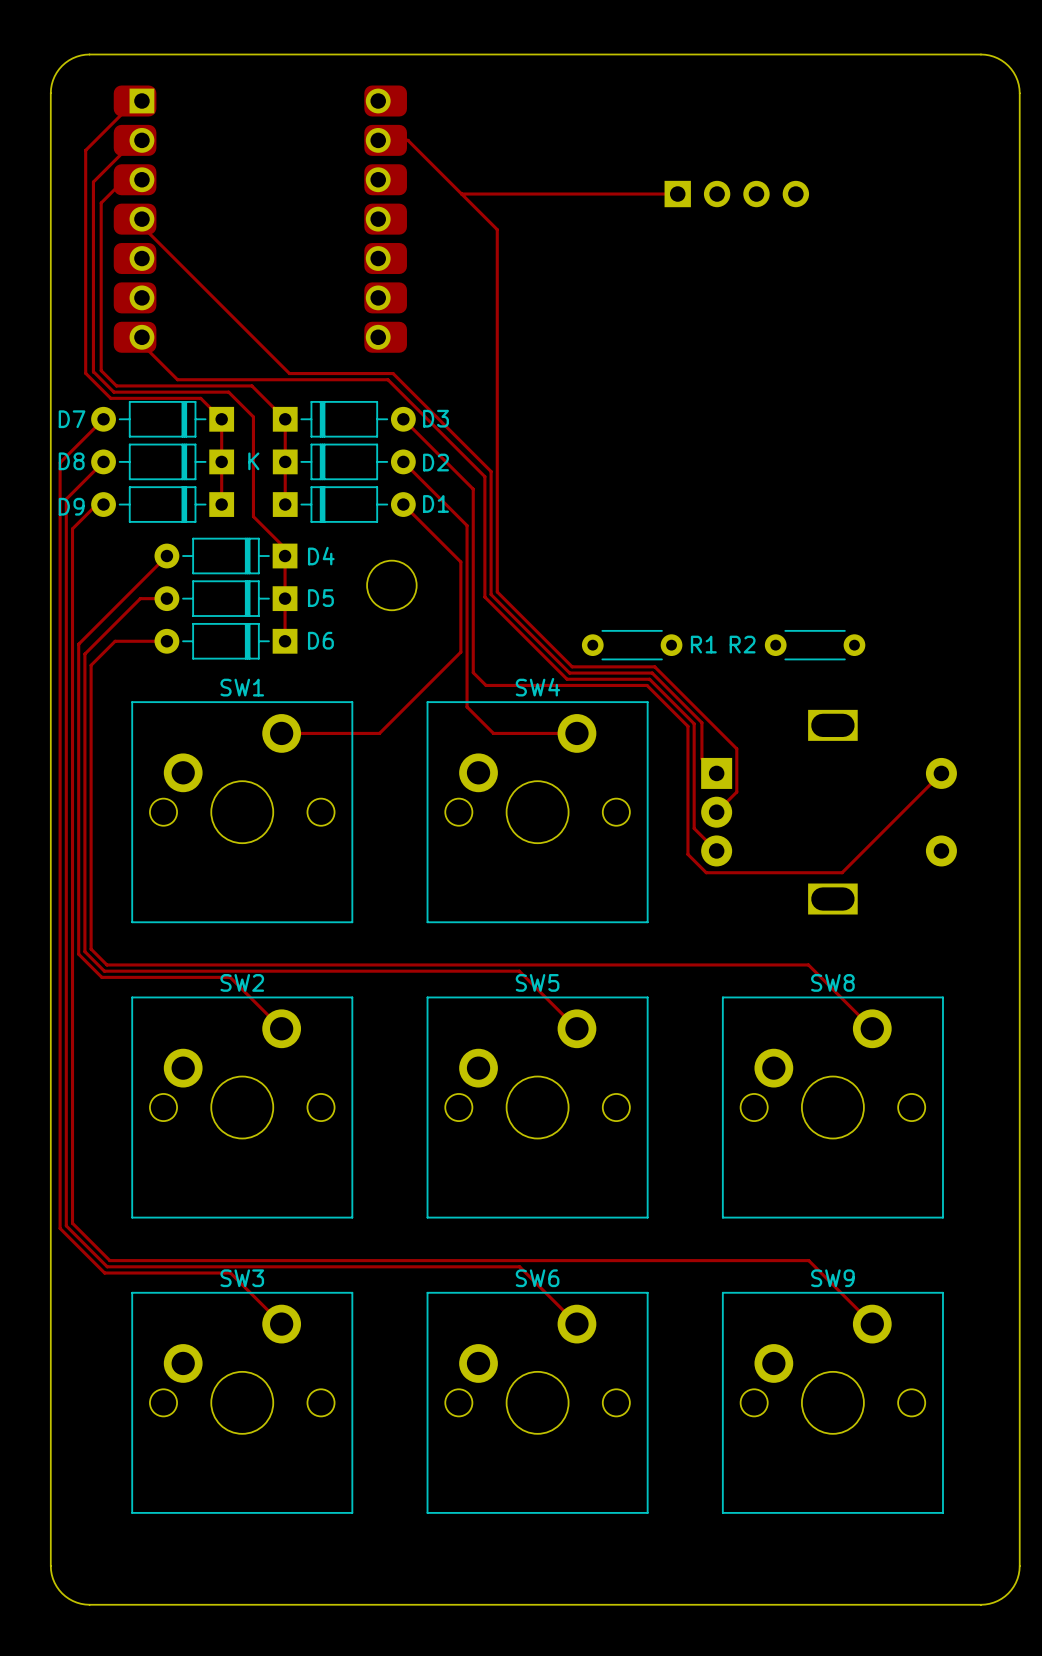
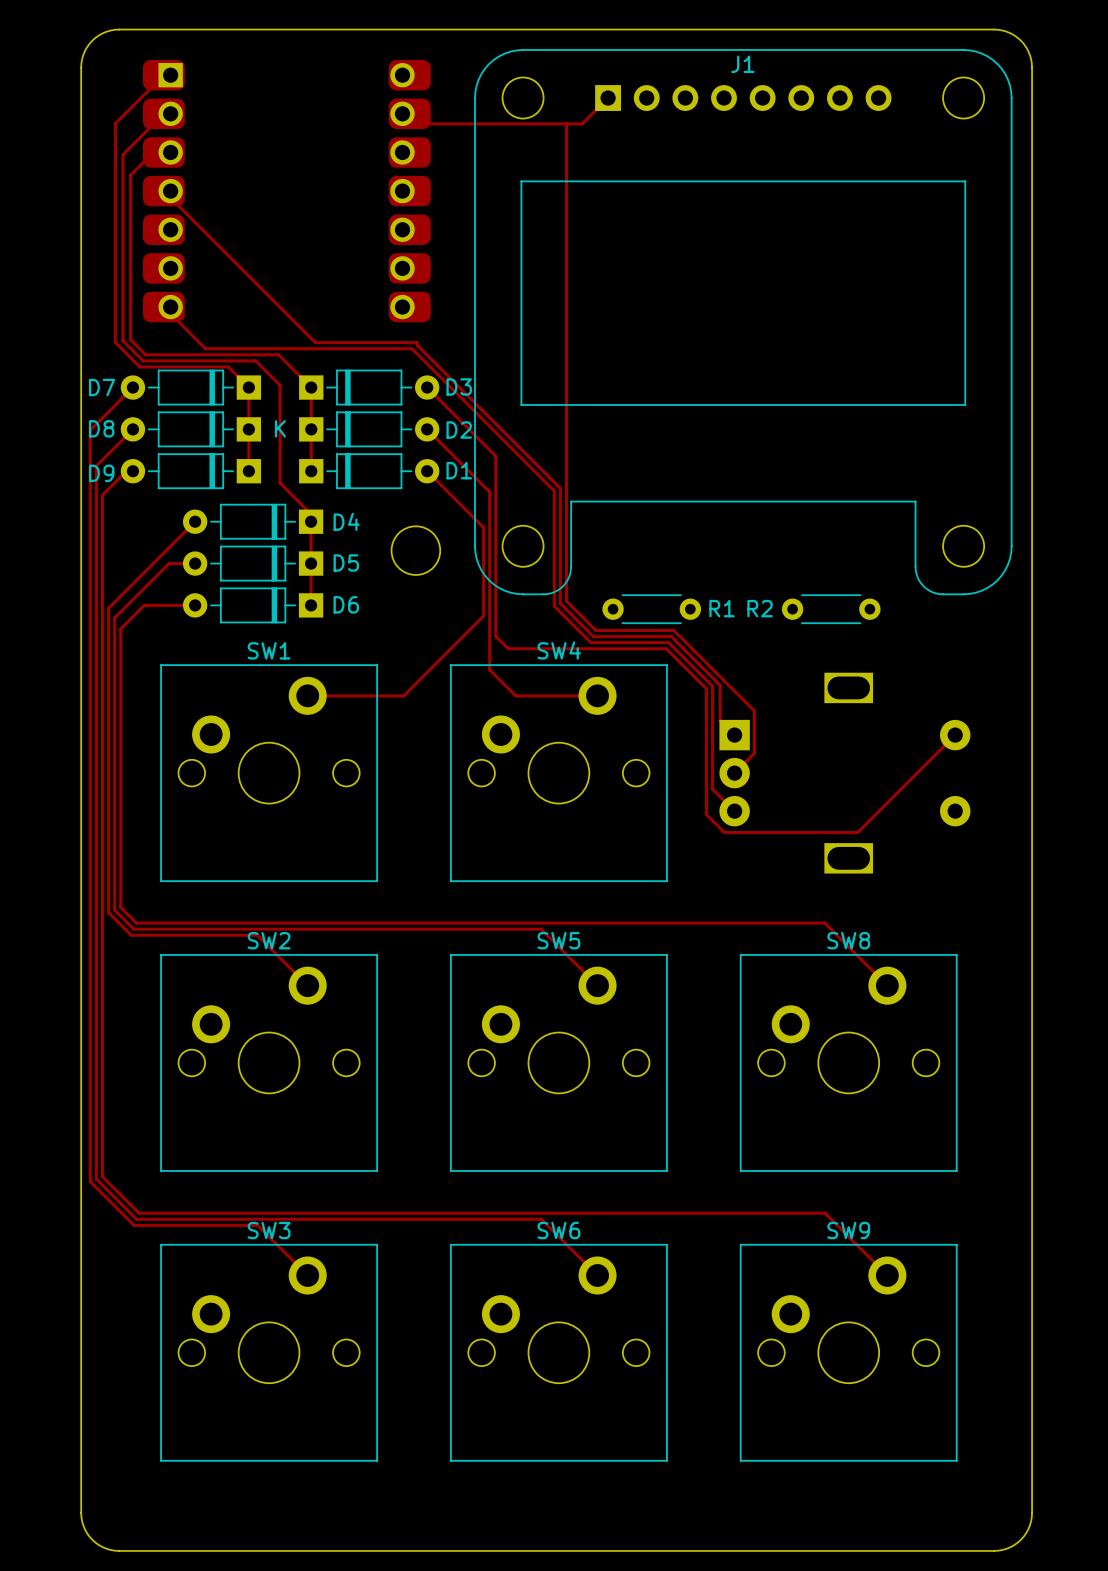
track: none -> (608, 98) (582, 123) (419, 123)
track: (378, 140) (407, 140) (497, 229) (497, 591) (572, 666) (575, 666) -> (566, 123) (566, 601) (595, 630)
track: (461, 194) (677, 194) -> none
part: (736, 194) -> none
J1: none -> (743, 322)
track: (393, 373) (491, 471) (491, 594) (569, 673) (572, 673) -> (417, 342) (417, 345) (560, 488) (560, 603) (593, 636)
track: (484, 476) (484, 597) (567, 679) (570, 679) -> (507, 443) (554, 491) (554, 606) (590, 642)

